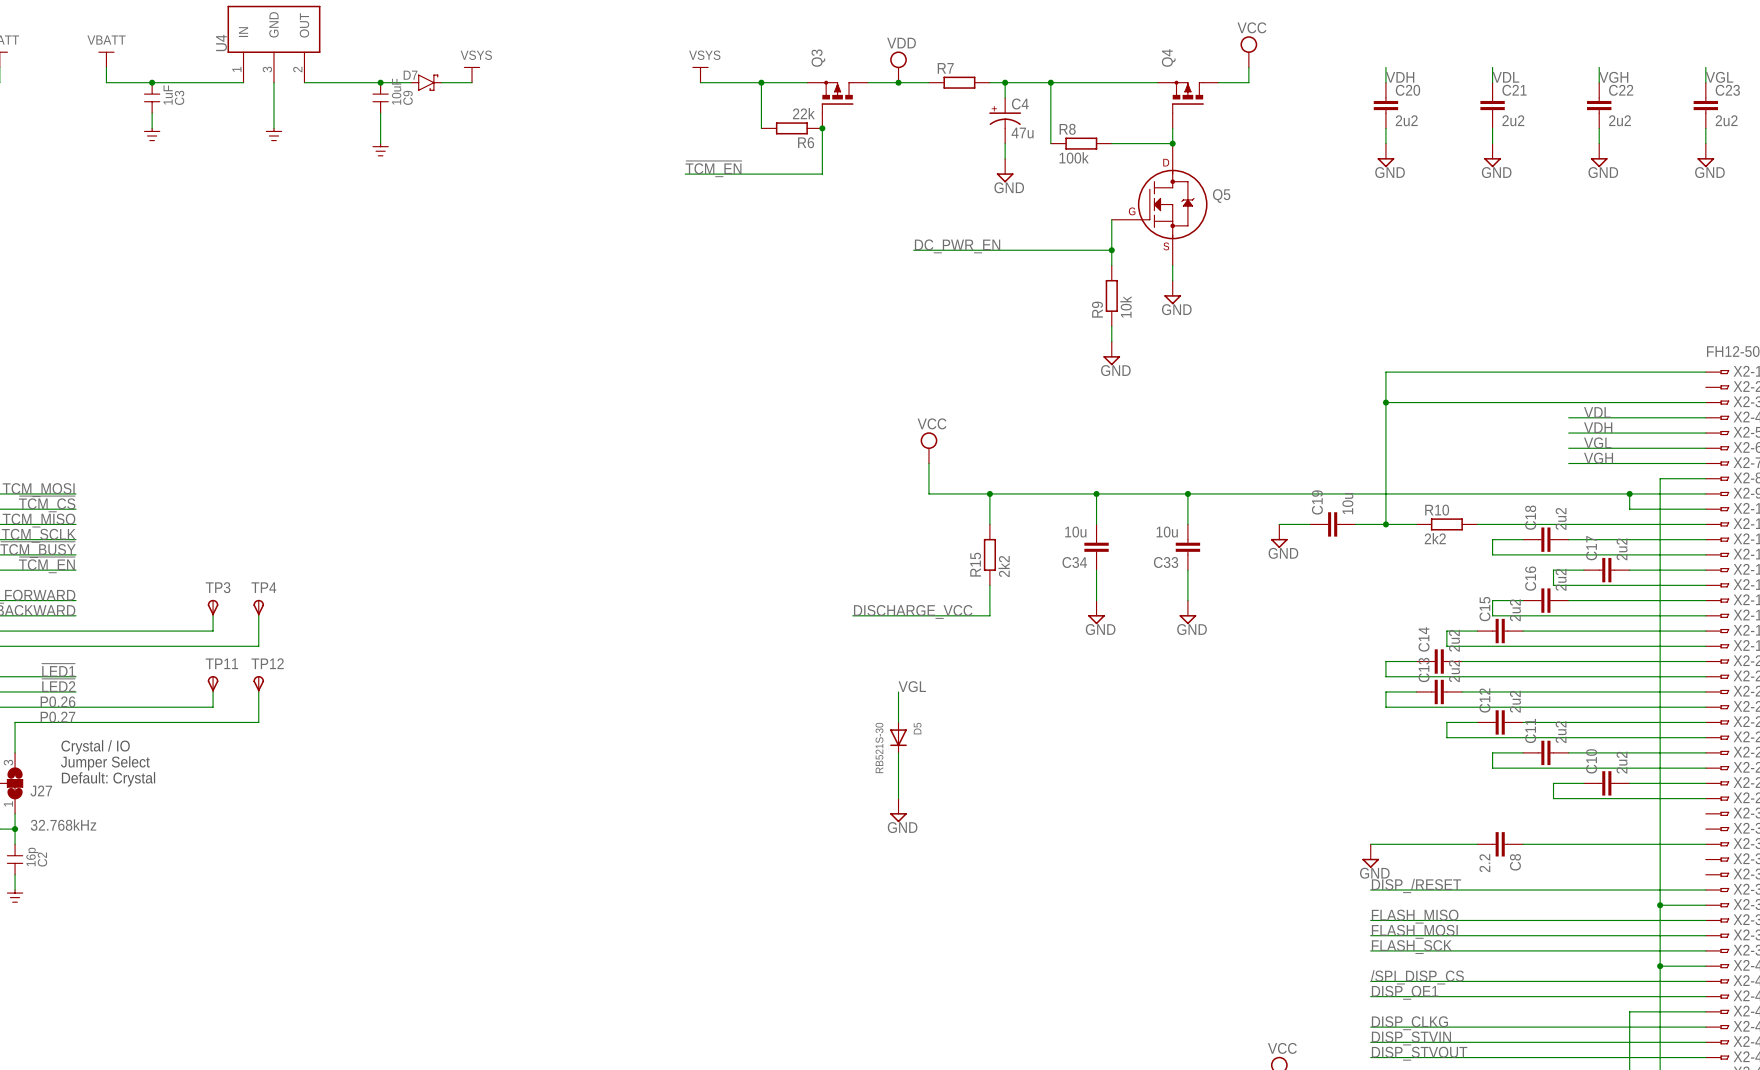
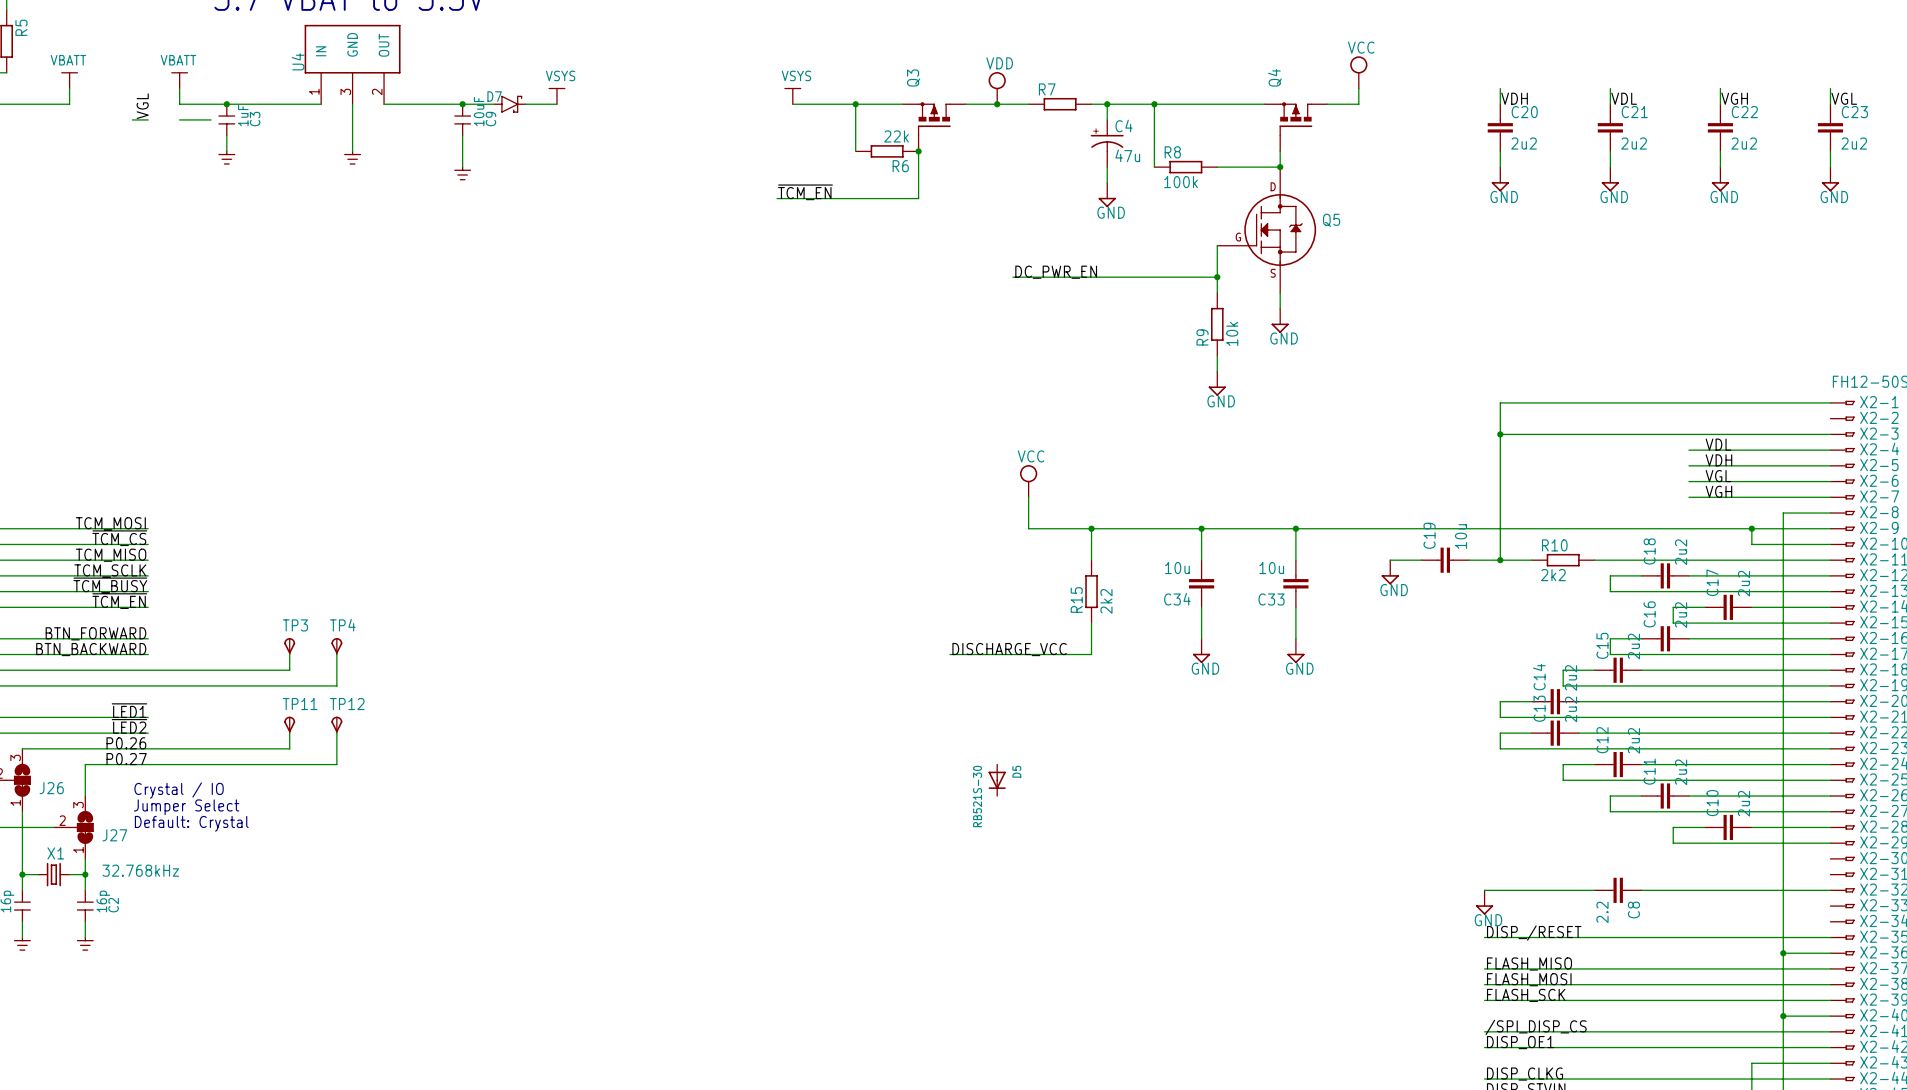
label: none -> VGL (142, 106)
wire: none -> (132, 119) (148, 119)
wire: none -> (179, 119) (211, 119)
label: VGL (912, 686) -> none
wire: (898, 691) (898, 722) -> none
wire: (898, 752) (898, 798) -> none
power symbol: GND (898, 810) -> none

